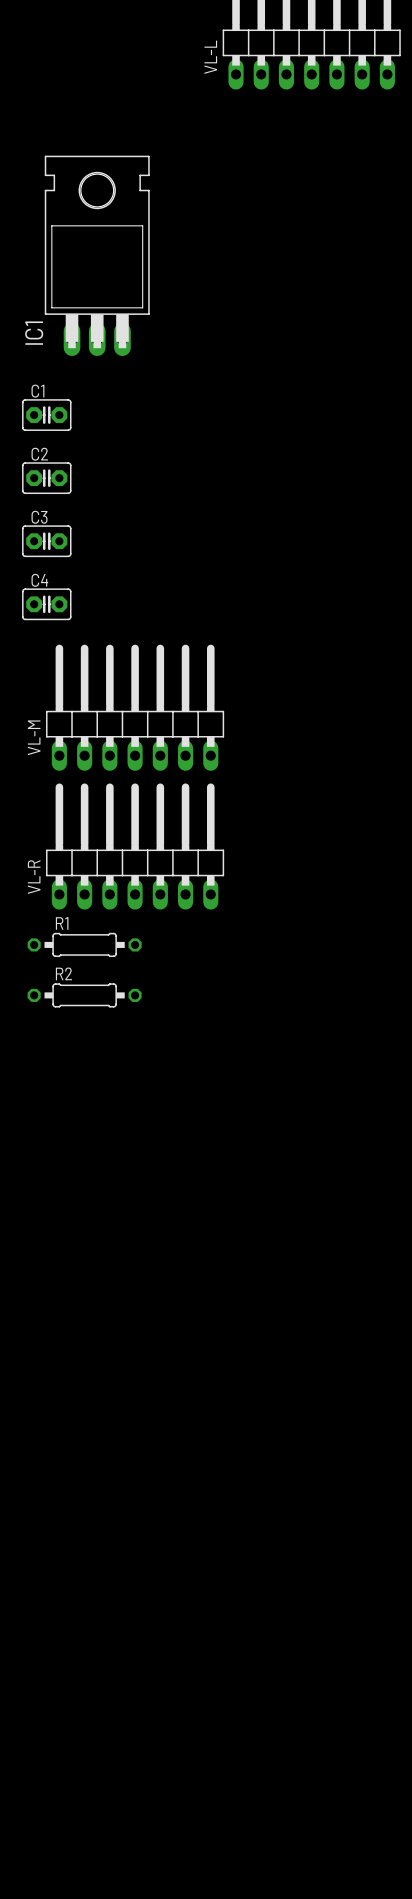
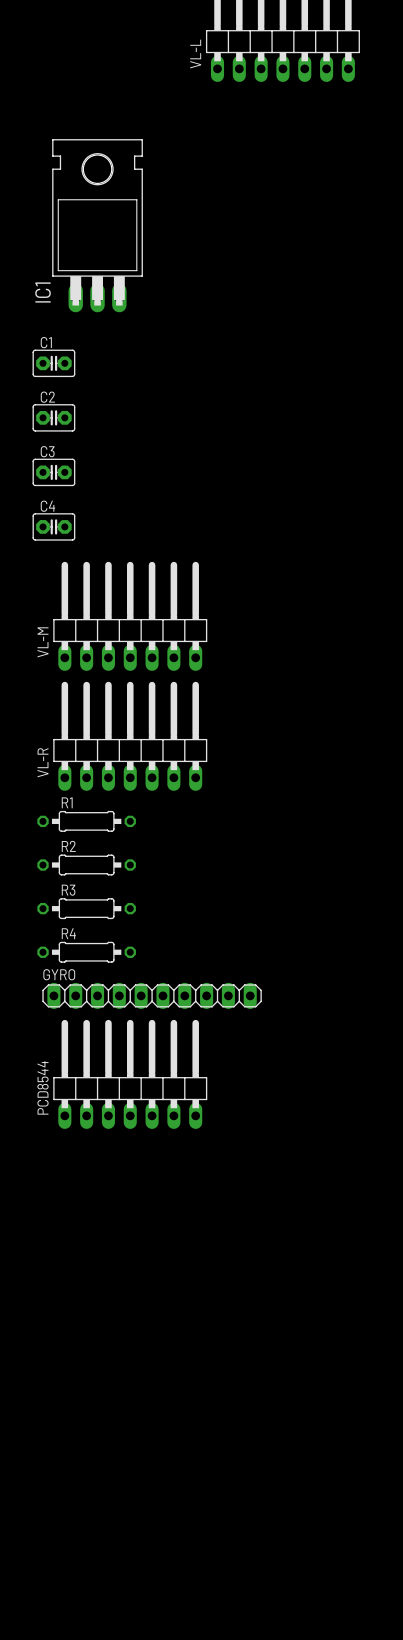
R3: none -> (86, 908)
R4: none -> (86, 952)
GYRO: none -> (152, 995)
PCD8544: none -> (130, 1074)

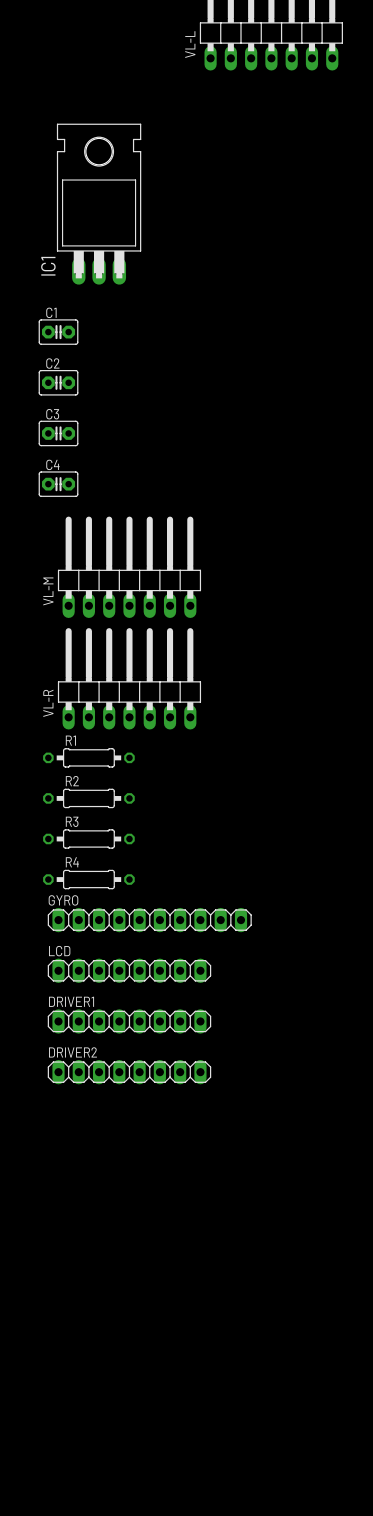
LCD: none -> (129, 970)
PCD8544: (130, 1074) -> none
DRIVER1: none -> (129, 1021)
DRIVER2: none -> (129, 1072)

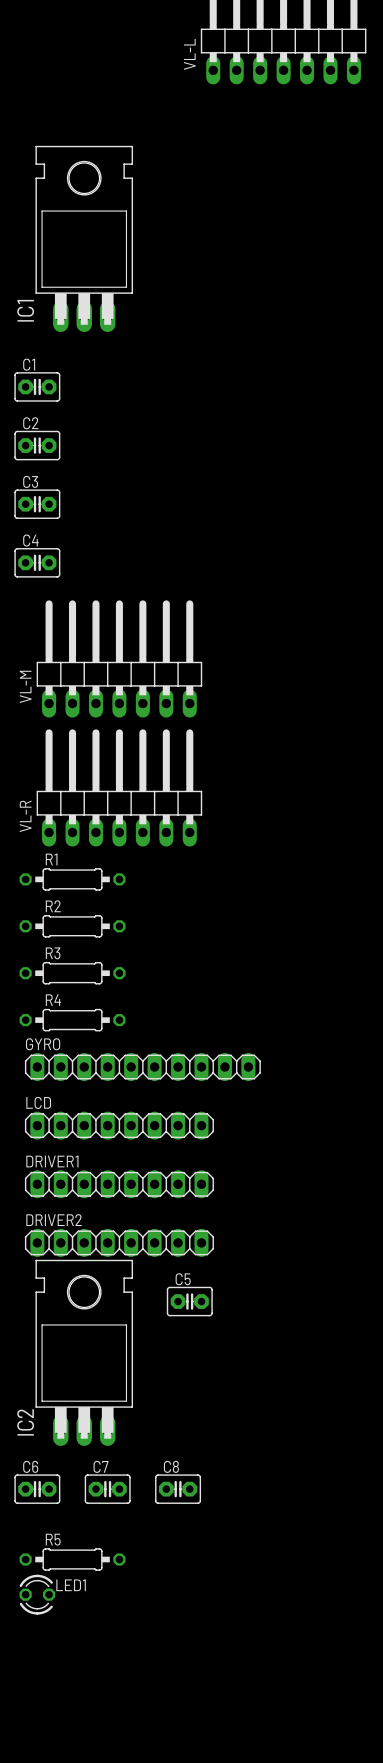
C5: none -> (189, 1301)
IC2: none -> (84, 1352)
C6: none -> (37, 1489)
C7: none -> (107, 1489)
C8: none -> (178, 1489)
R5: none -> (72, 1559)
LED1: none -> (37, 1594)

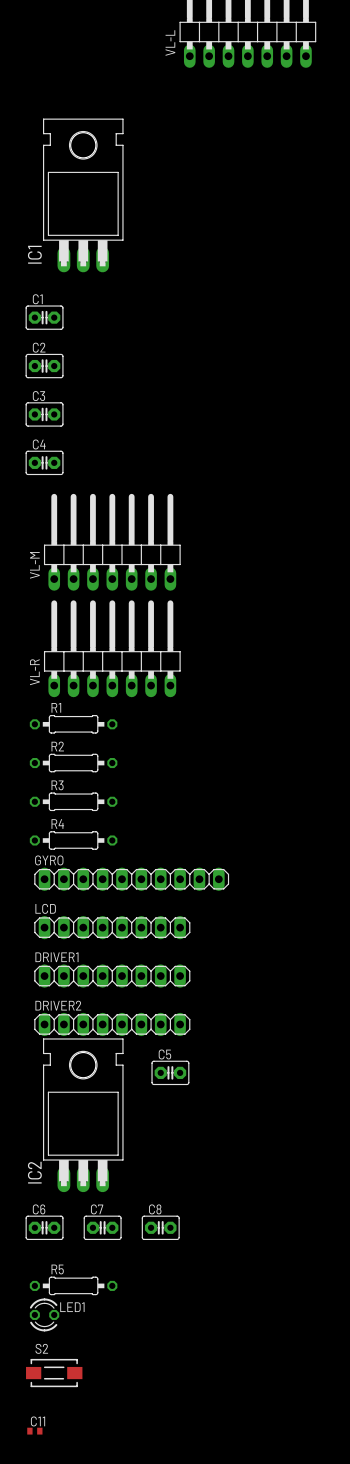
S2: none -> (54, 1373)
C11: none -> (34, 1431)

